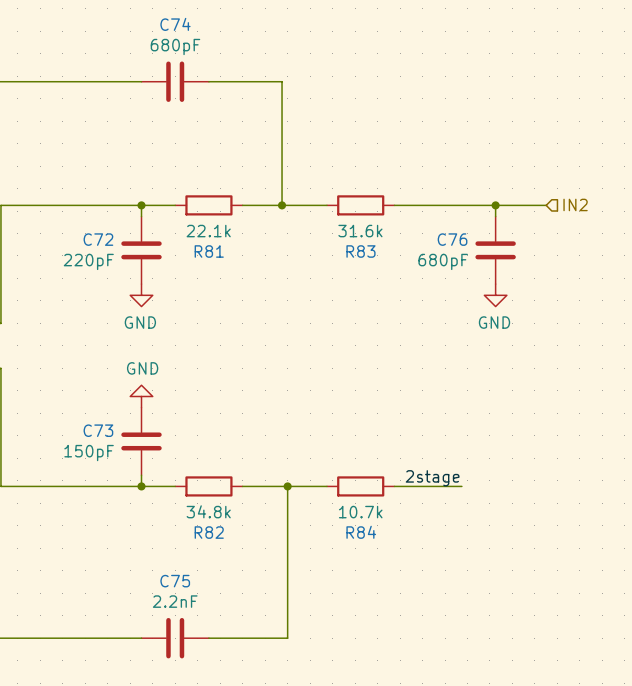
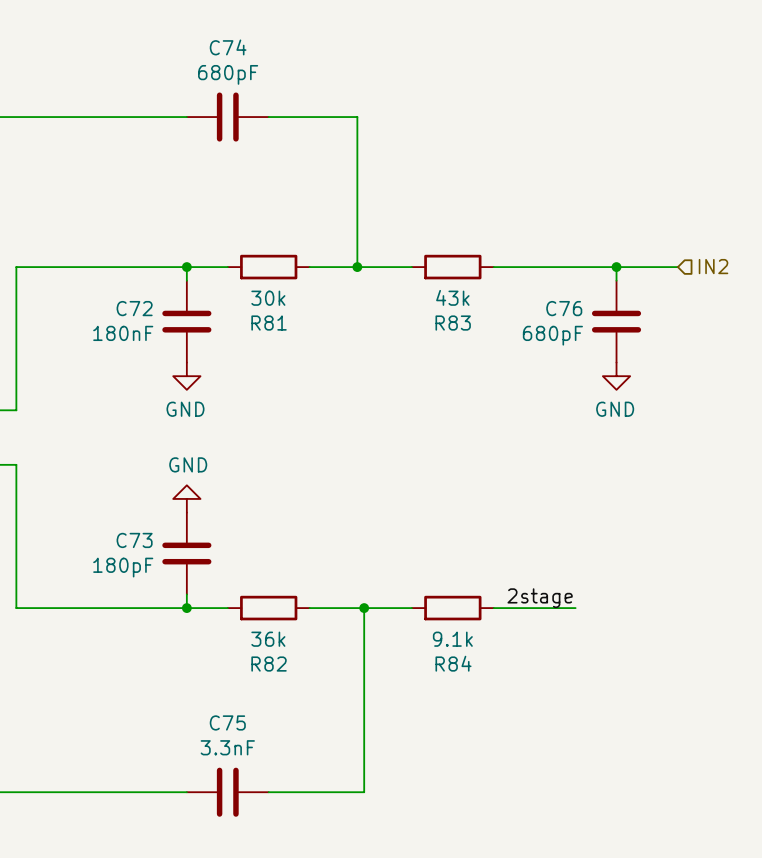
R81 value: 22.1k (208, 231) -> 30k (268, 298)
R83 value: 31.6k (360, 231) -> 43k (452, 297)
C72 value: 220pF (88, 261) -> 180nF (123, 333)
C73 value: 150pF (89, 453) -> 180pF (123, 567)
R82 value: 34.8k (208, 511) -> 36k (268, 639)
R84 value: 10.7k (360, 512) -> 9.1k (452, 639)
C75 value: 2.2nF (175, 601) -> 3.3nF (227, 747)

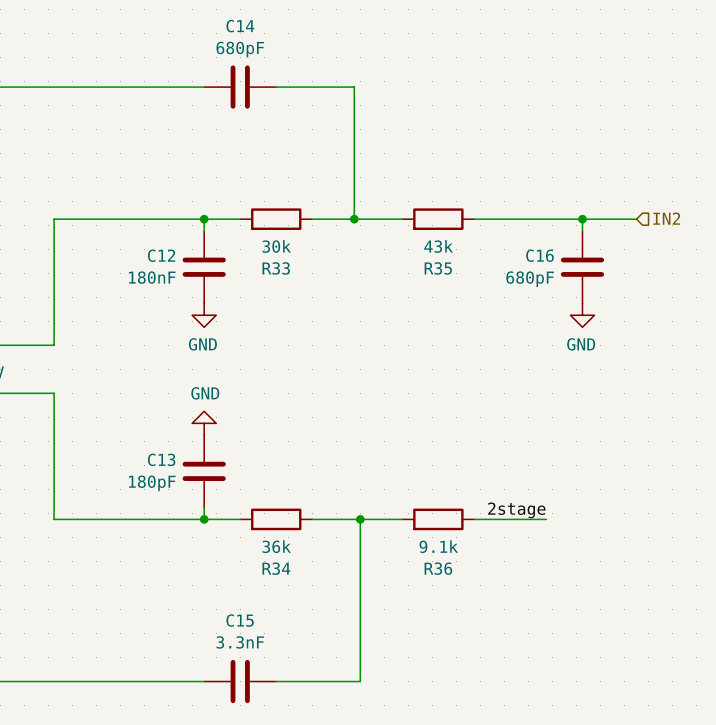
C74 name: C74 (228, 47) -> C14 (240, 26)
C72 name: C72 (134, 308) -> C12 (161, 255)
C76 name: C76 (564, 308) -> C16 (540, 255)
R81 name: R81 (269, 323) -> R33 (276, 268)
R83 name: R83 (453, 323) -> R35 (438, 268)
C73 name: C73 (134, 540) -> C13 (161, 459)
R84 name: R84 (453, 663) -> R36 (438, 568)
R82 name: R82 (269, 664) -> R34 (276, 568)
C75 name: C75 (227, 722) -> C15 (240, 620)

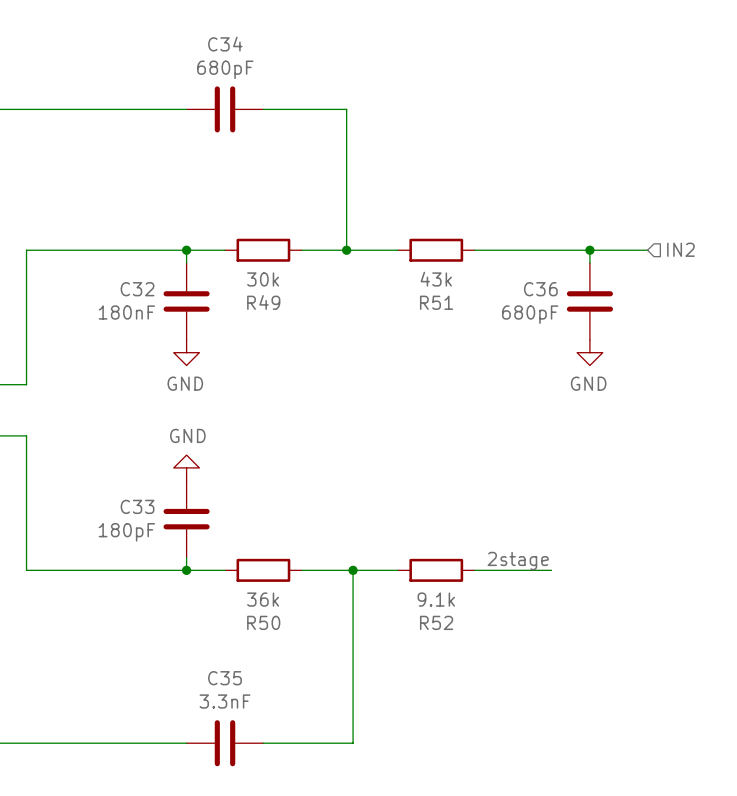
C14 name: C14 (240, 26) -> C34 (225, 44)
C12 name: C12 (161, 255) -> C32 (137, 289)
C16 name: C16 (540, 255) -> C36 (540, 289)
R33 name: R33 (276, 268) -> R49 (263, 302)
R35 name: R35 (438, 268) -> R51 (436, 302)
C13 name: C13 (161, 459) -> C33 (137, 506)
R34 name: R34 (276, 568) -> R50 (263, 622)
R36 name: R36 (438, 568) -> R52 (436, 622)
C15 name: C15 (240, 620) -> C35 (225, 678)

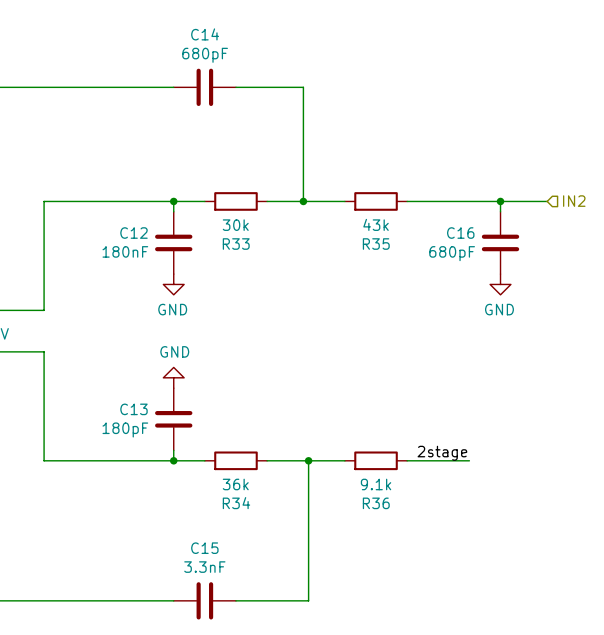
C34 name: C34 (225, 44) -> C14 (205, 34)
C32 name: C32 (137, 289) -> C12 (133, 233)
C36 name: C36 (540, 289) -> C16 (460, 233)
R49 name: R49 (263, 302) -> R33 (236, 244)
R51 name: R51 (436, 302) -> R35 (376, 244)
C33 name: C33 (137, 506) -> C13 (133, 409)
R50 name: R50 (263, 622) -> R34 (236, 503)
R52 name: R52 (436, 622) -> R36 (376, 503)
C35 name: C35 (225, 678) -> C15 (204, 548)

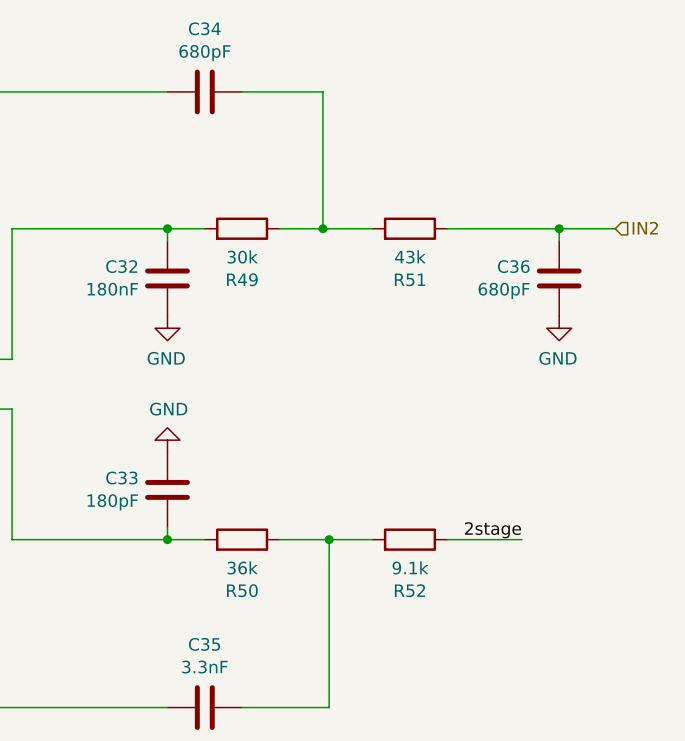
C14 name: C14 (205, 34) -> C34 (204, 28)
C12 name: C12 (133, 233) -> C32 (121, 266)
C16 name: C16 (460, 233) -> C36 (513, 266)
R33 name: R33 (236, 244) -> R49 (242, 279)
R35 name: R35 (376, 244) -> R51 (410, 279)
C13 name: C13 (133, 409) -> C33 (121, 478)
R34 name: R34 (236, 503) -> R50 (242, 590)
R36 name: R36 (376, 503) -> R52 (409, 590)
C15 name: C15 (204, 548) -> C35 (204, 644)

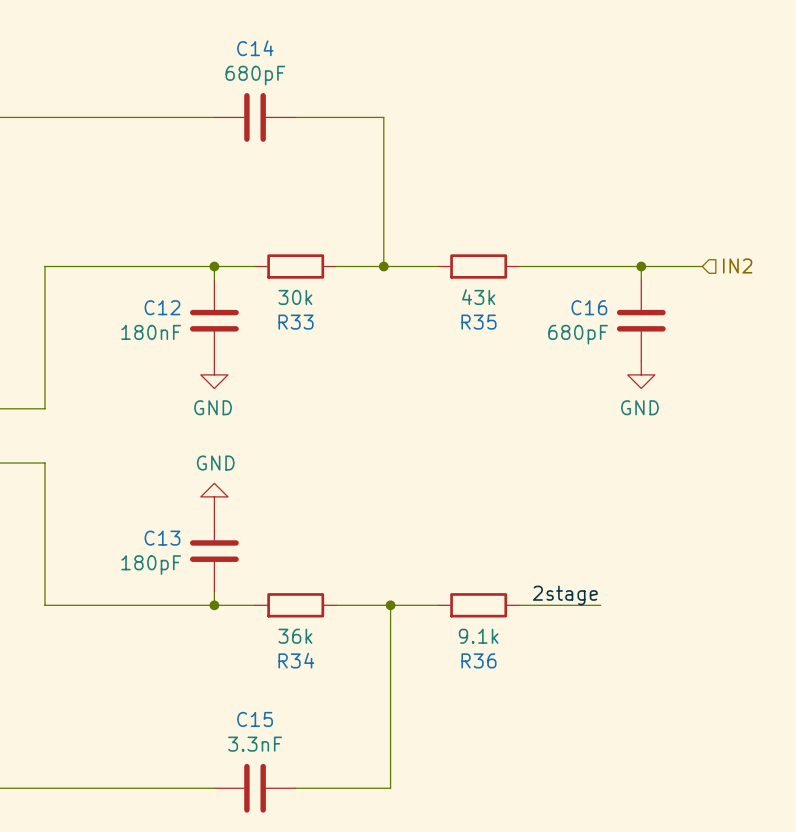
C34 name: C34 (204, 28) -> C14 (255, 48)
C32 name: C32 (121, 266) -> C12 (162, 307)
C36 name: C36 (513, 266) -> C16 (589, 307)
R49 name: R49 (242, 279) -> R33 (296, 322)
R51 name: R51 (410, 279) -> R35 (478, 322)
C33 name: C33 (121, 478) -> C13 (162, 538)
R50 name: R50 (242, 590) -> R34 (296, 660)
R52 name: R52 (409, 590) -> R36 (478, 660)
C35 name: C35 (204, 644) -> C15 (255, 719)

